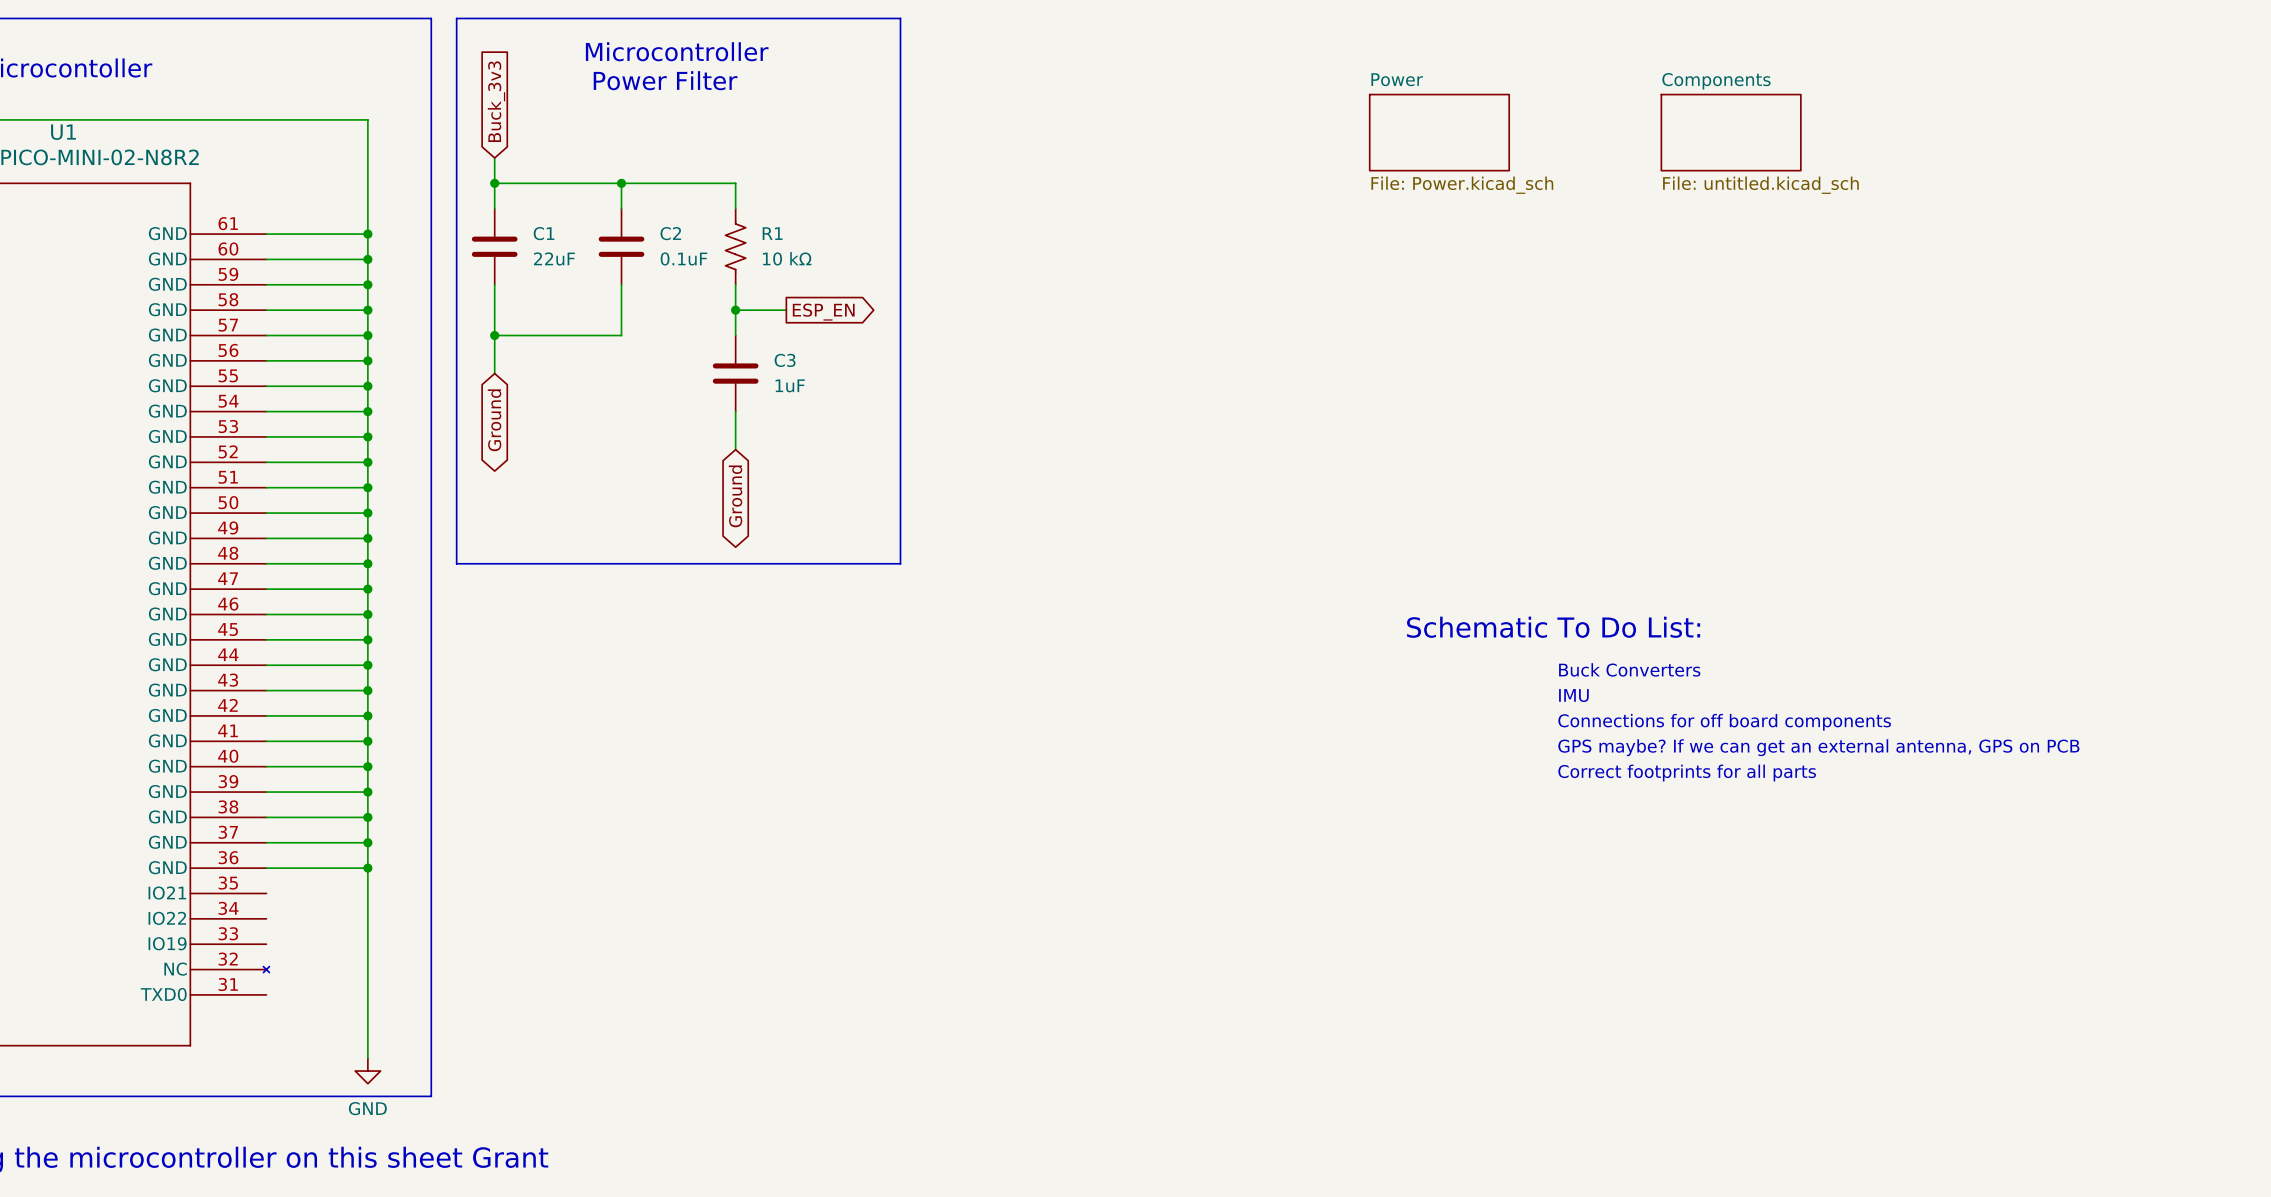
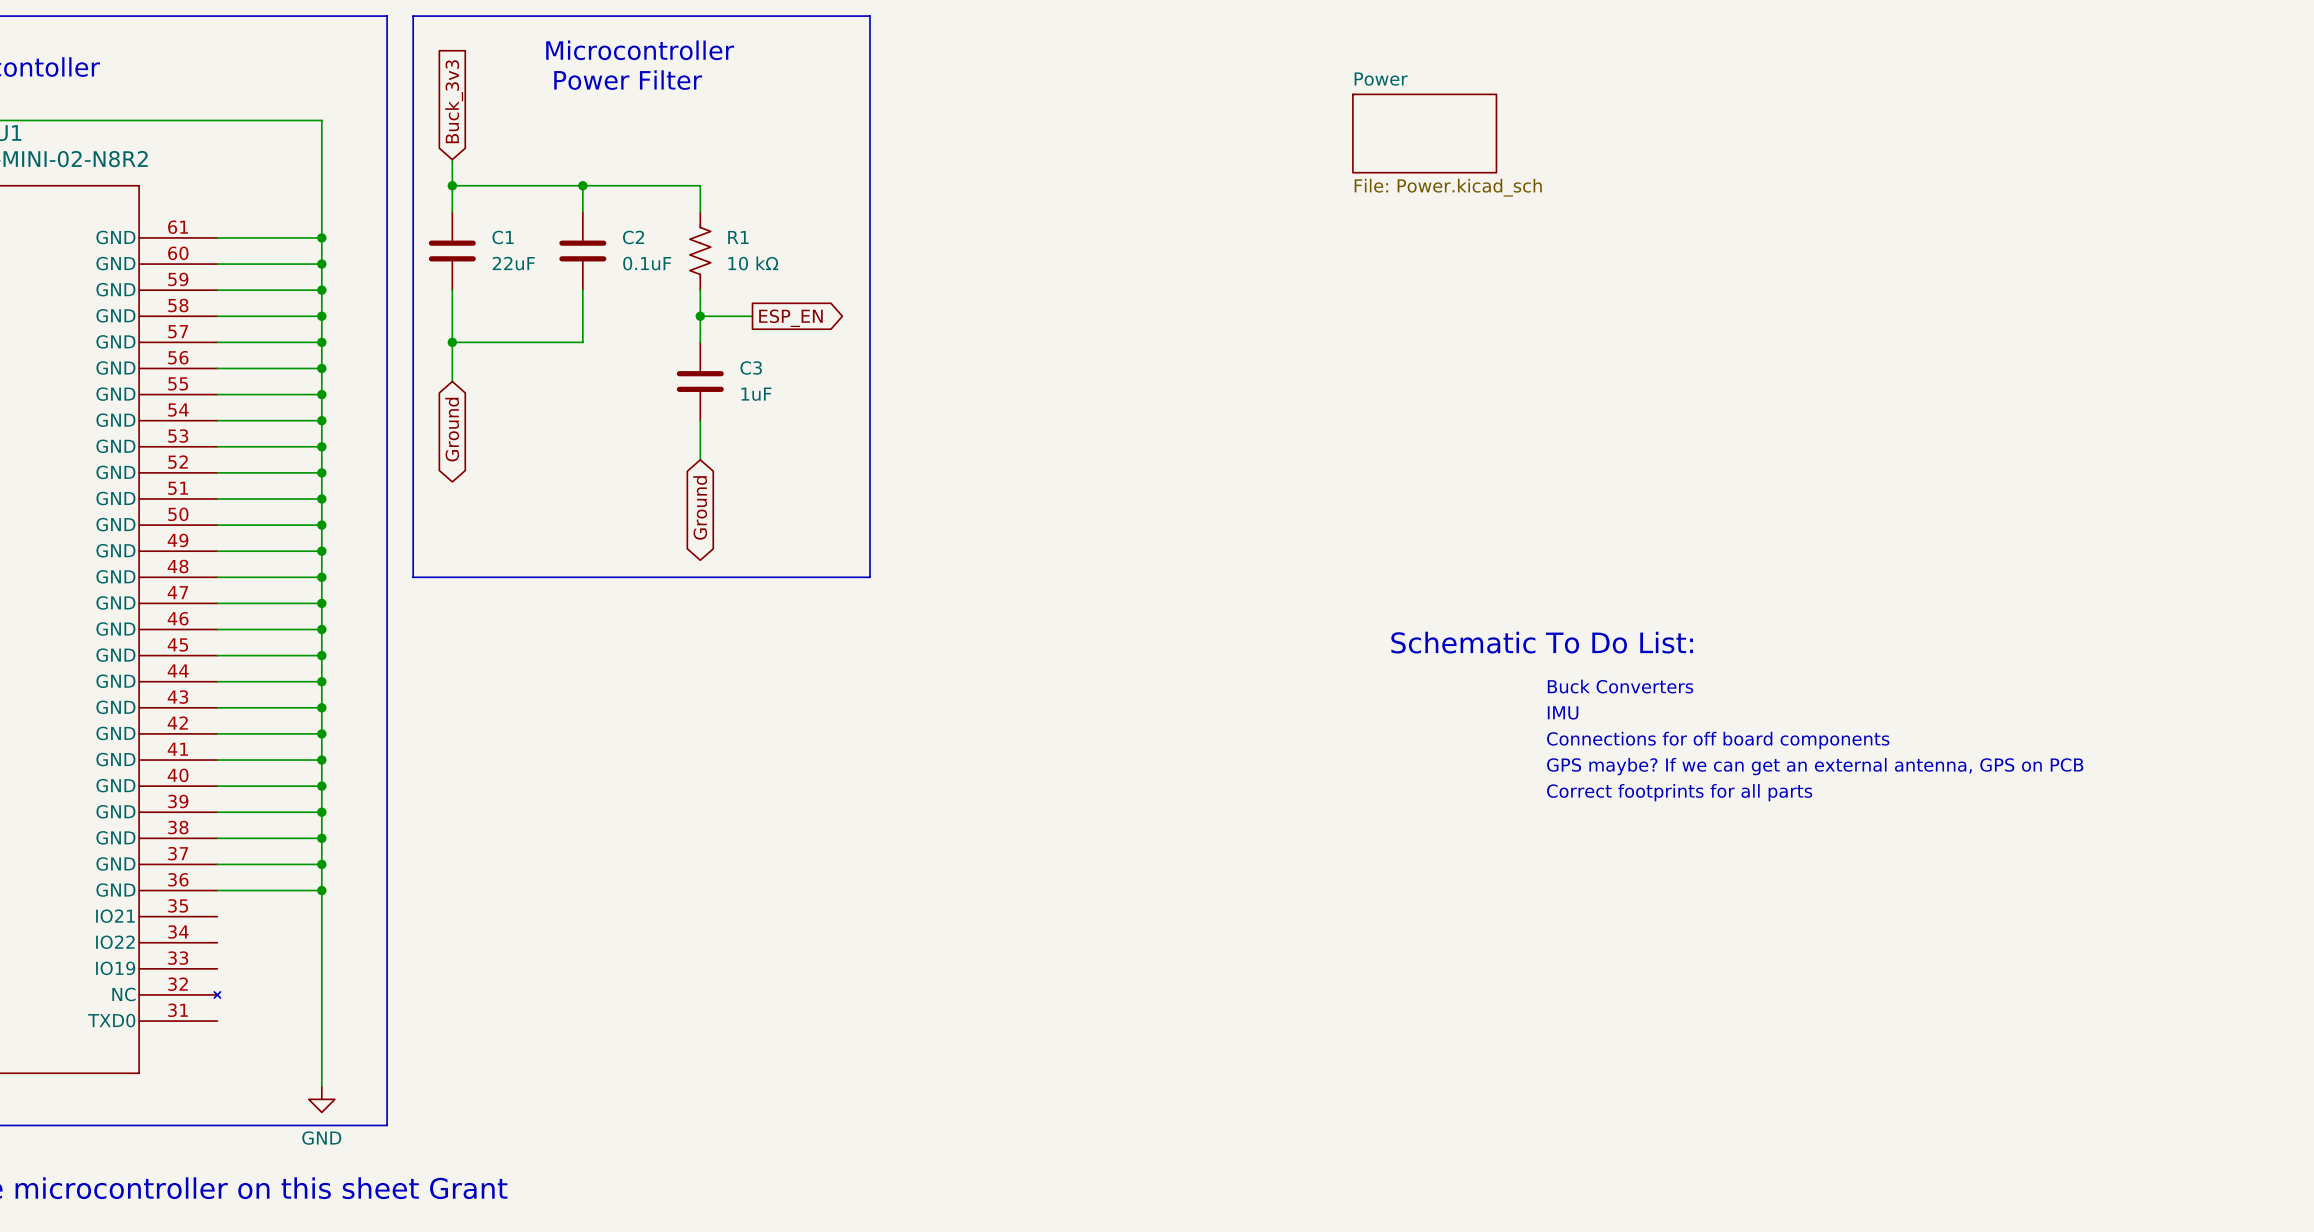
sheet Components: File: untitled.kicad_sch (1731, 132) -> none

